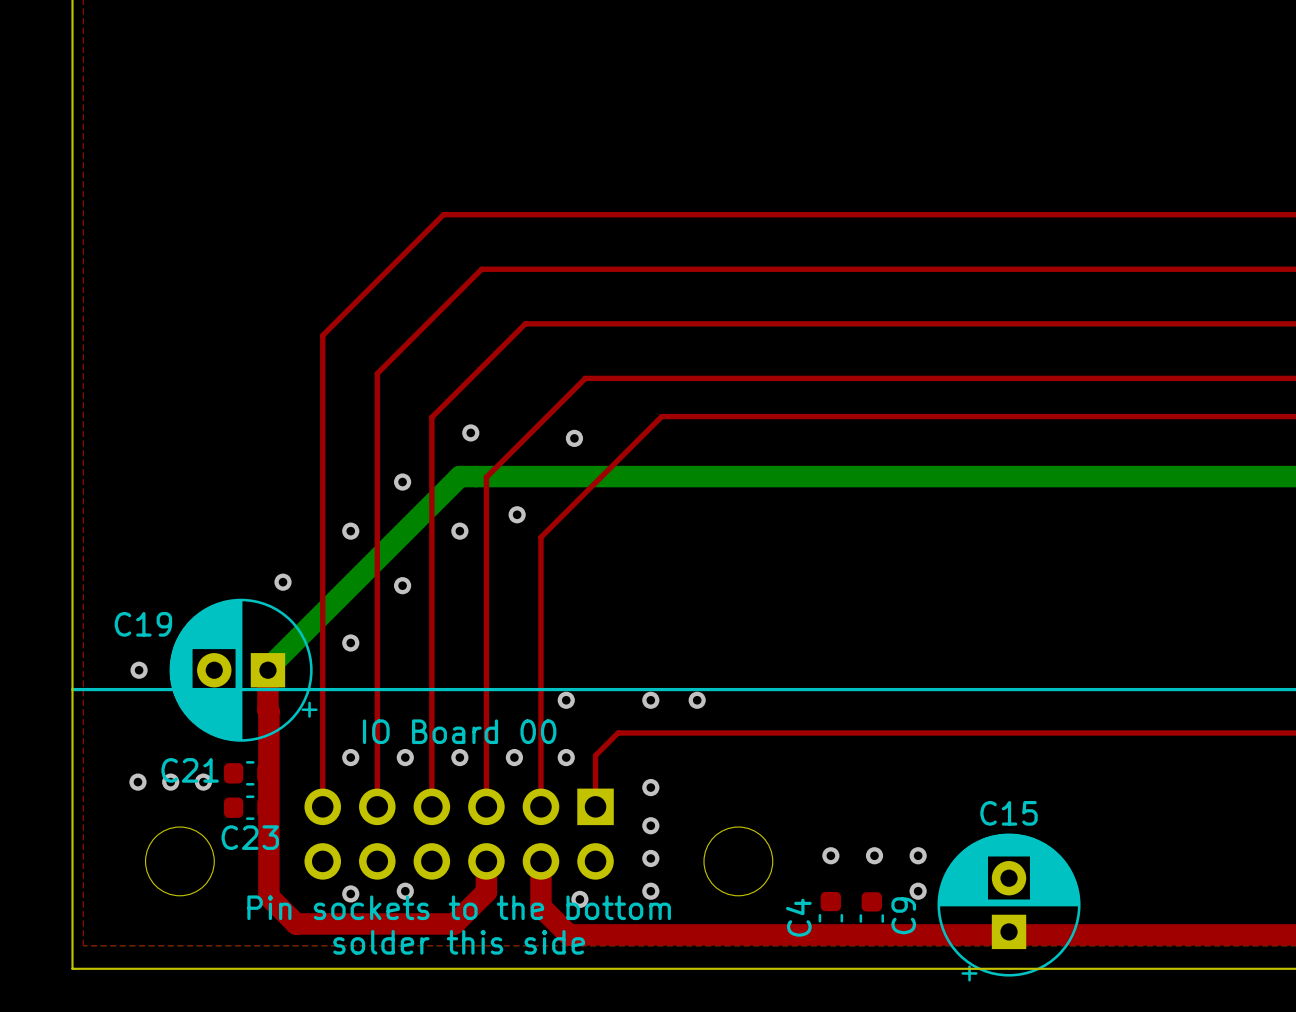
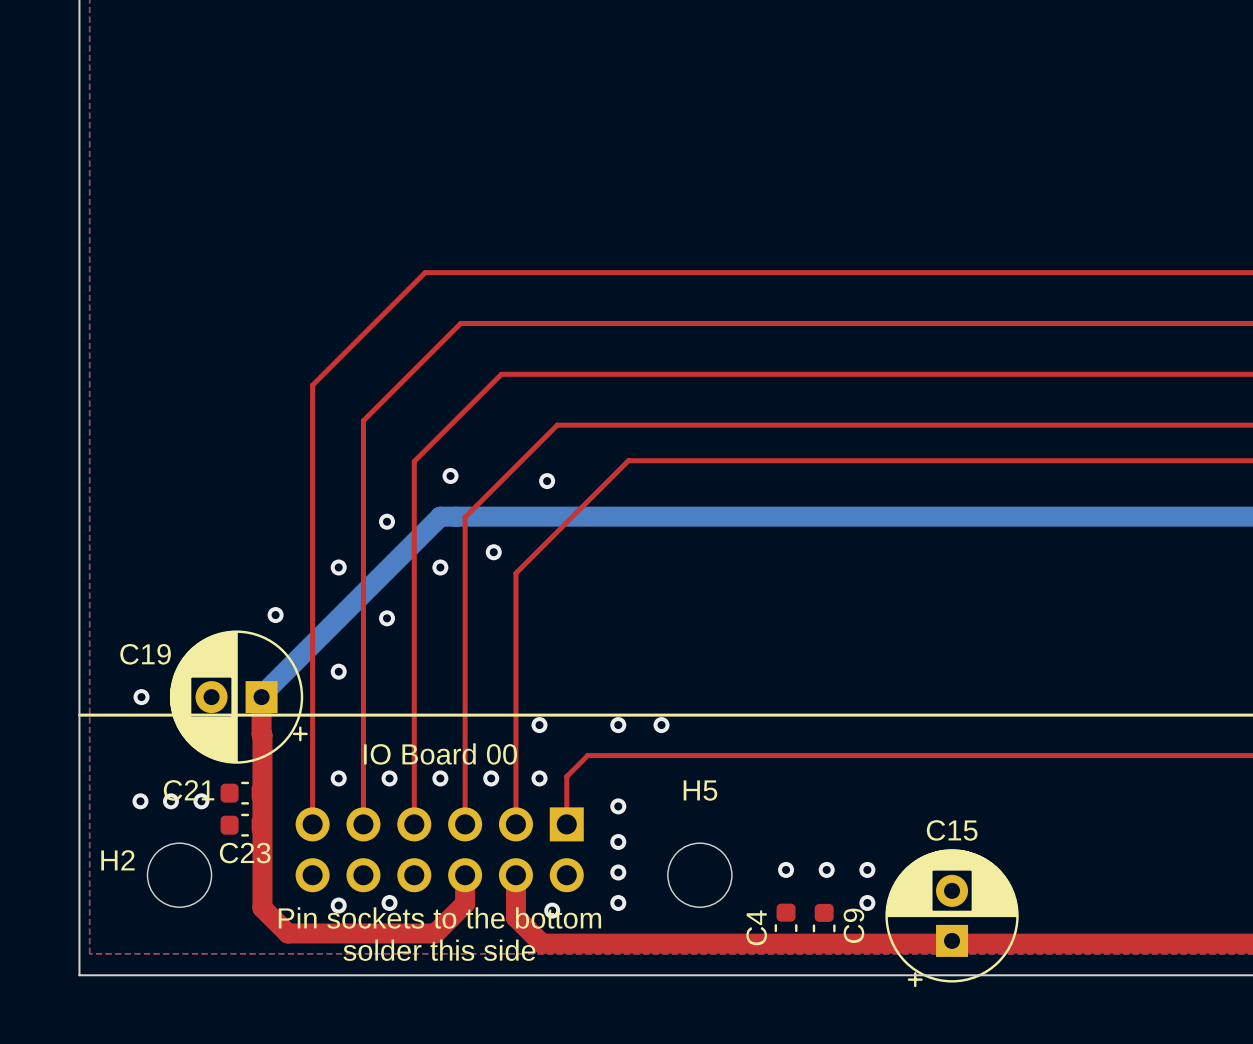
H5 name: none -> H5 (700, 790)
H2 name: none -> H2 (117, 860)

